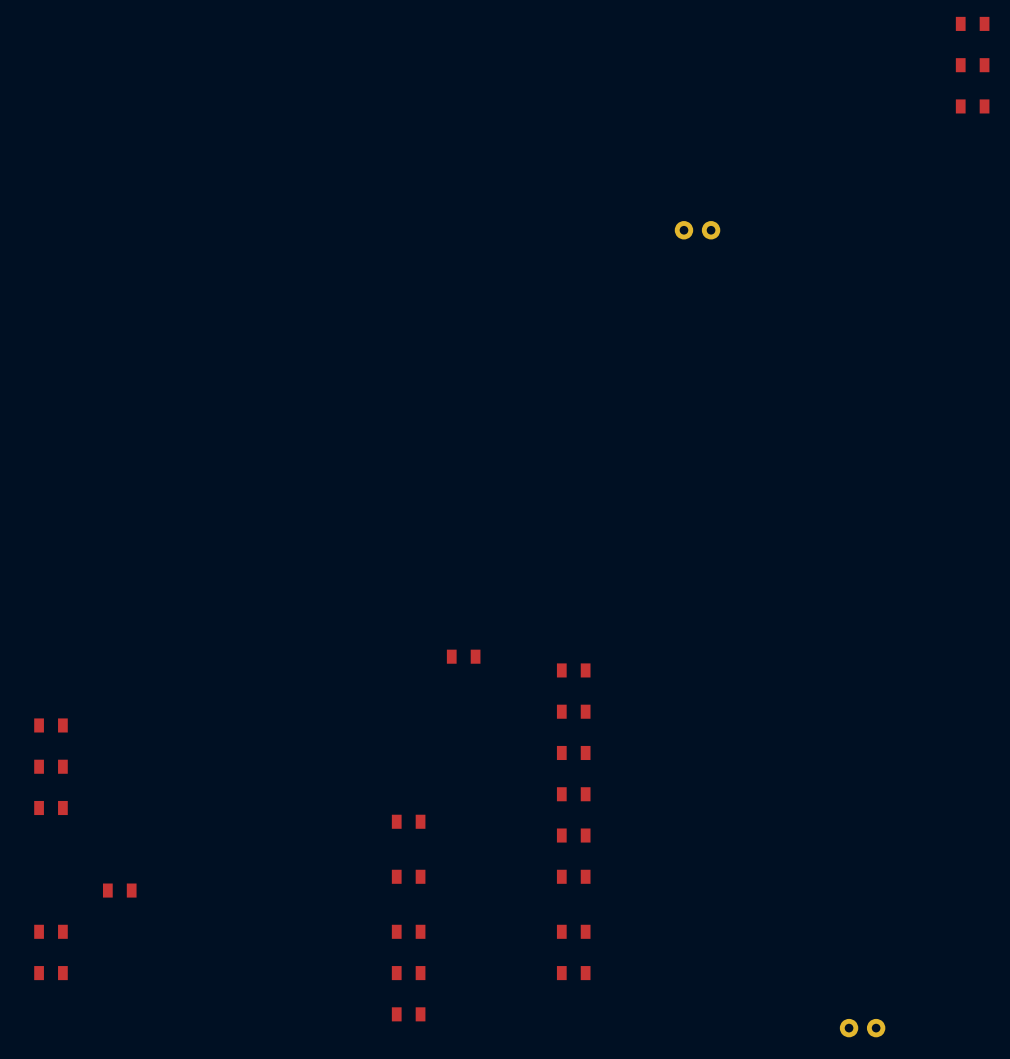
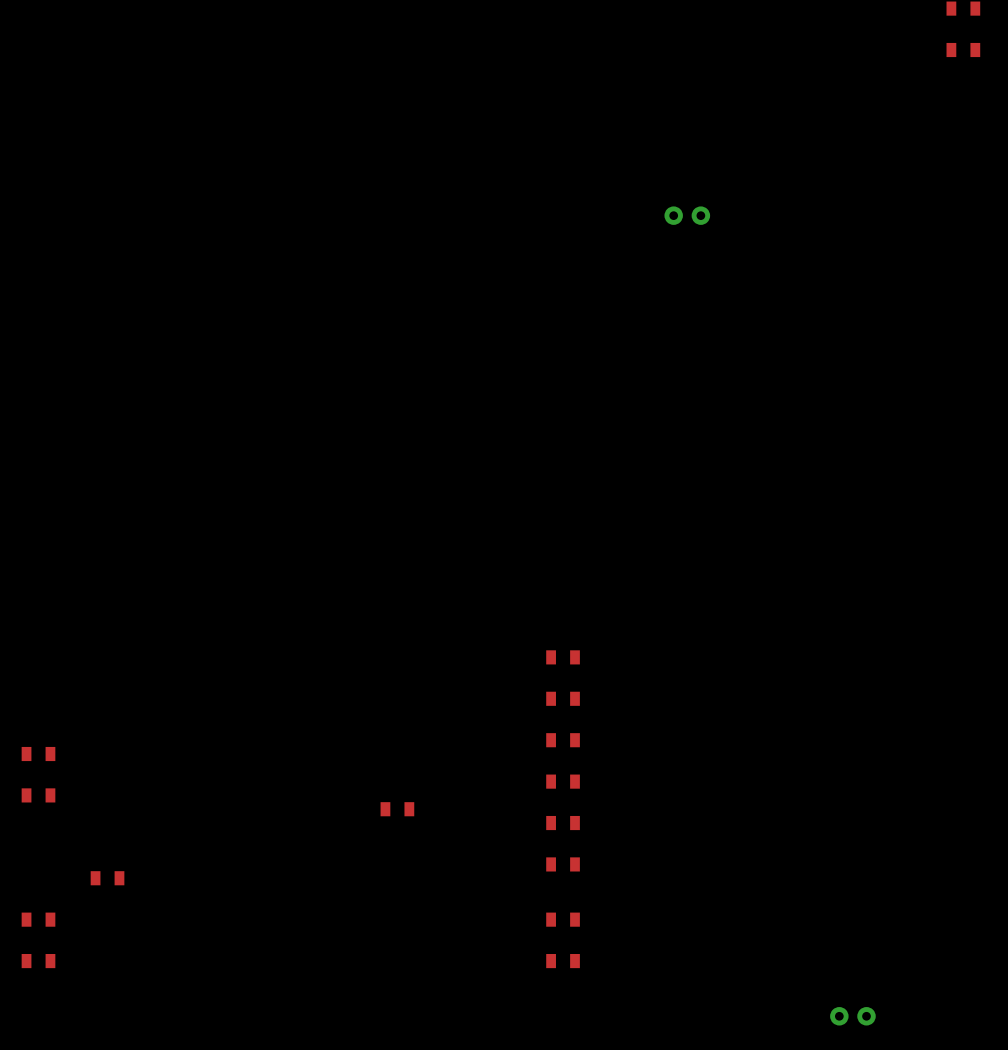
part: (972, 106) -> none
part: (463, 656) -> none
part: (50, 725) -> none
part: (408, 876) -> none
part: (408, 931) -> none
part: (408, 973) -> none
part: (408, 1014) -> none

